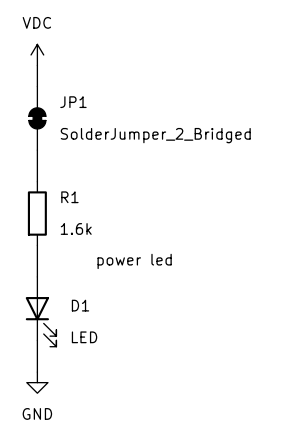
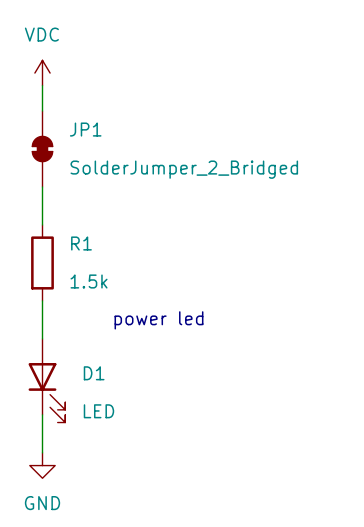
R1 value: 1.6k (76, 228) -> 1.5k (89, 281)

